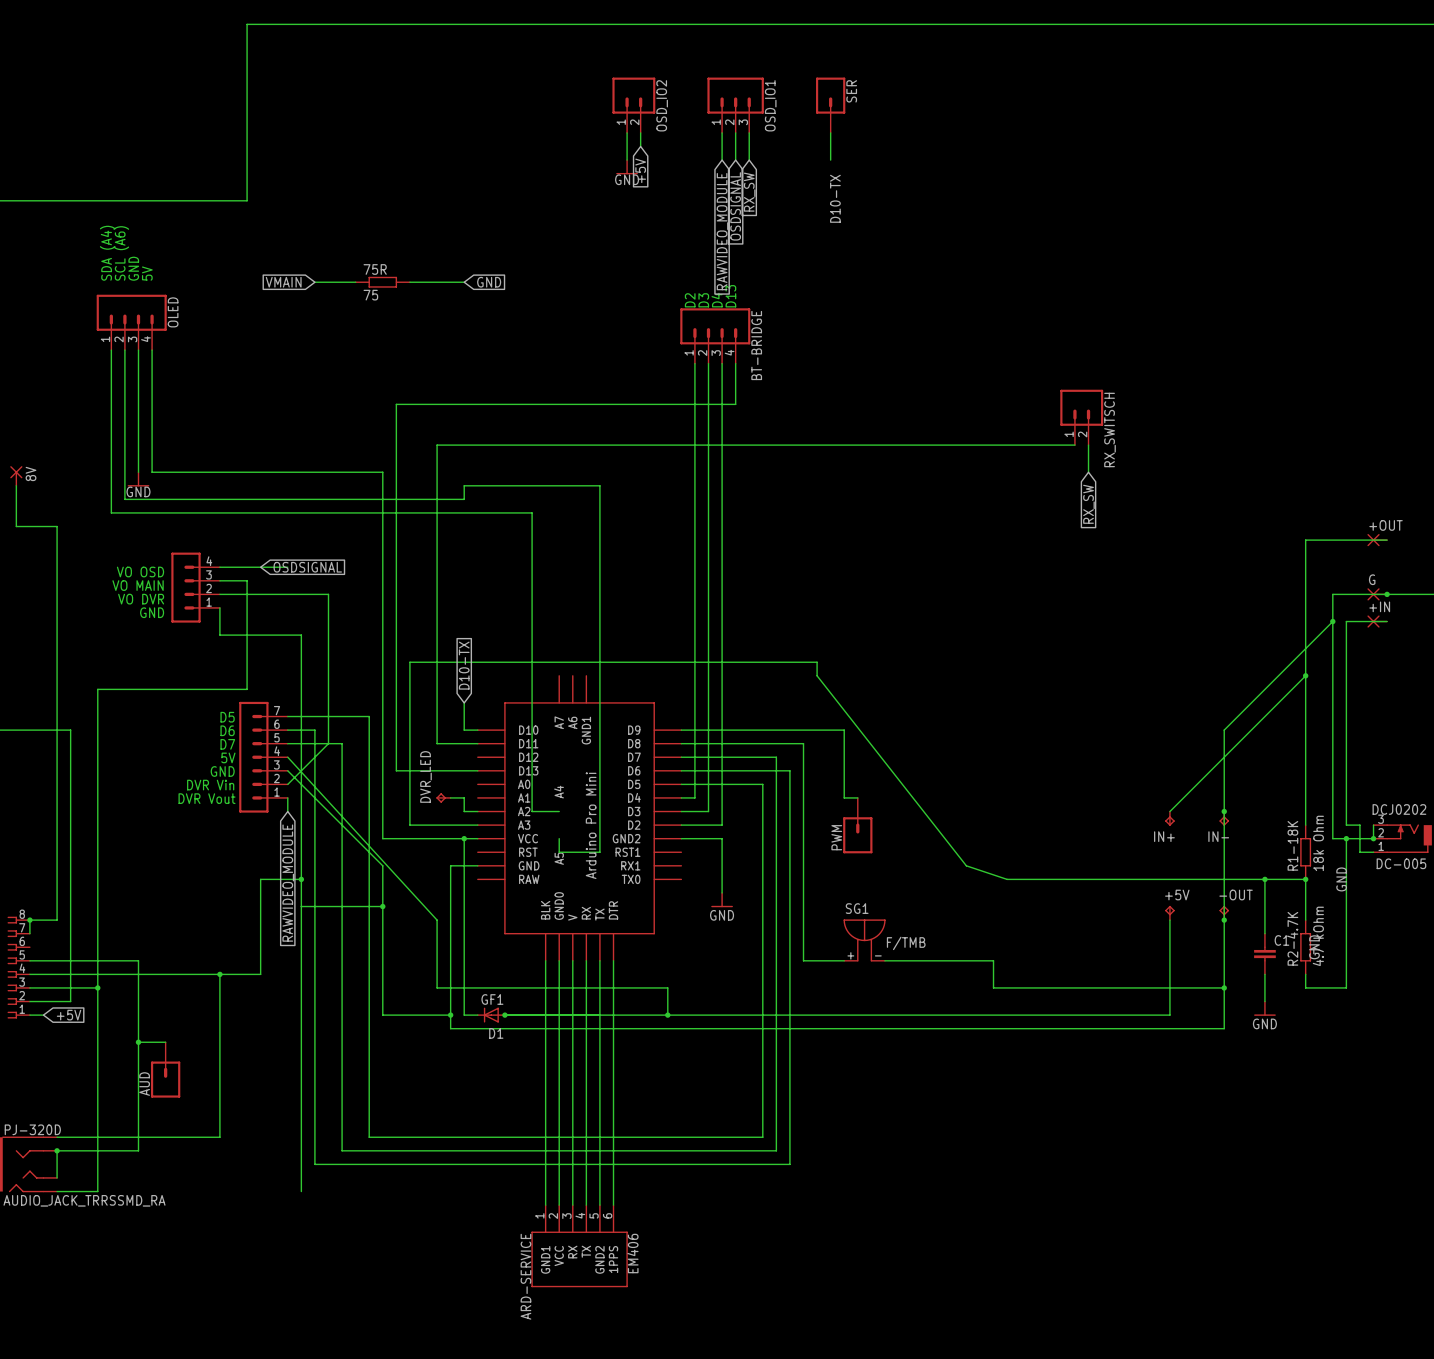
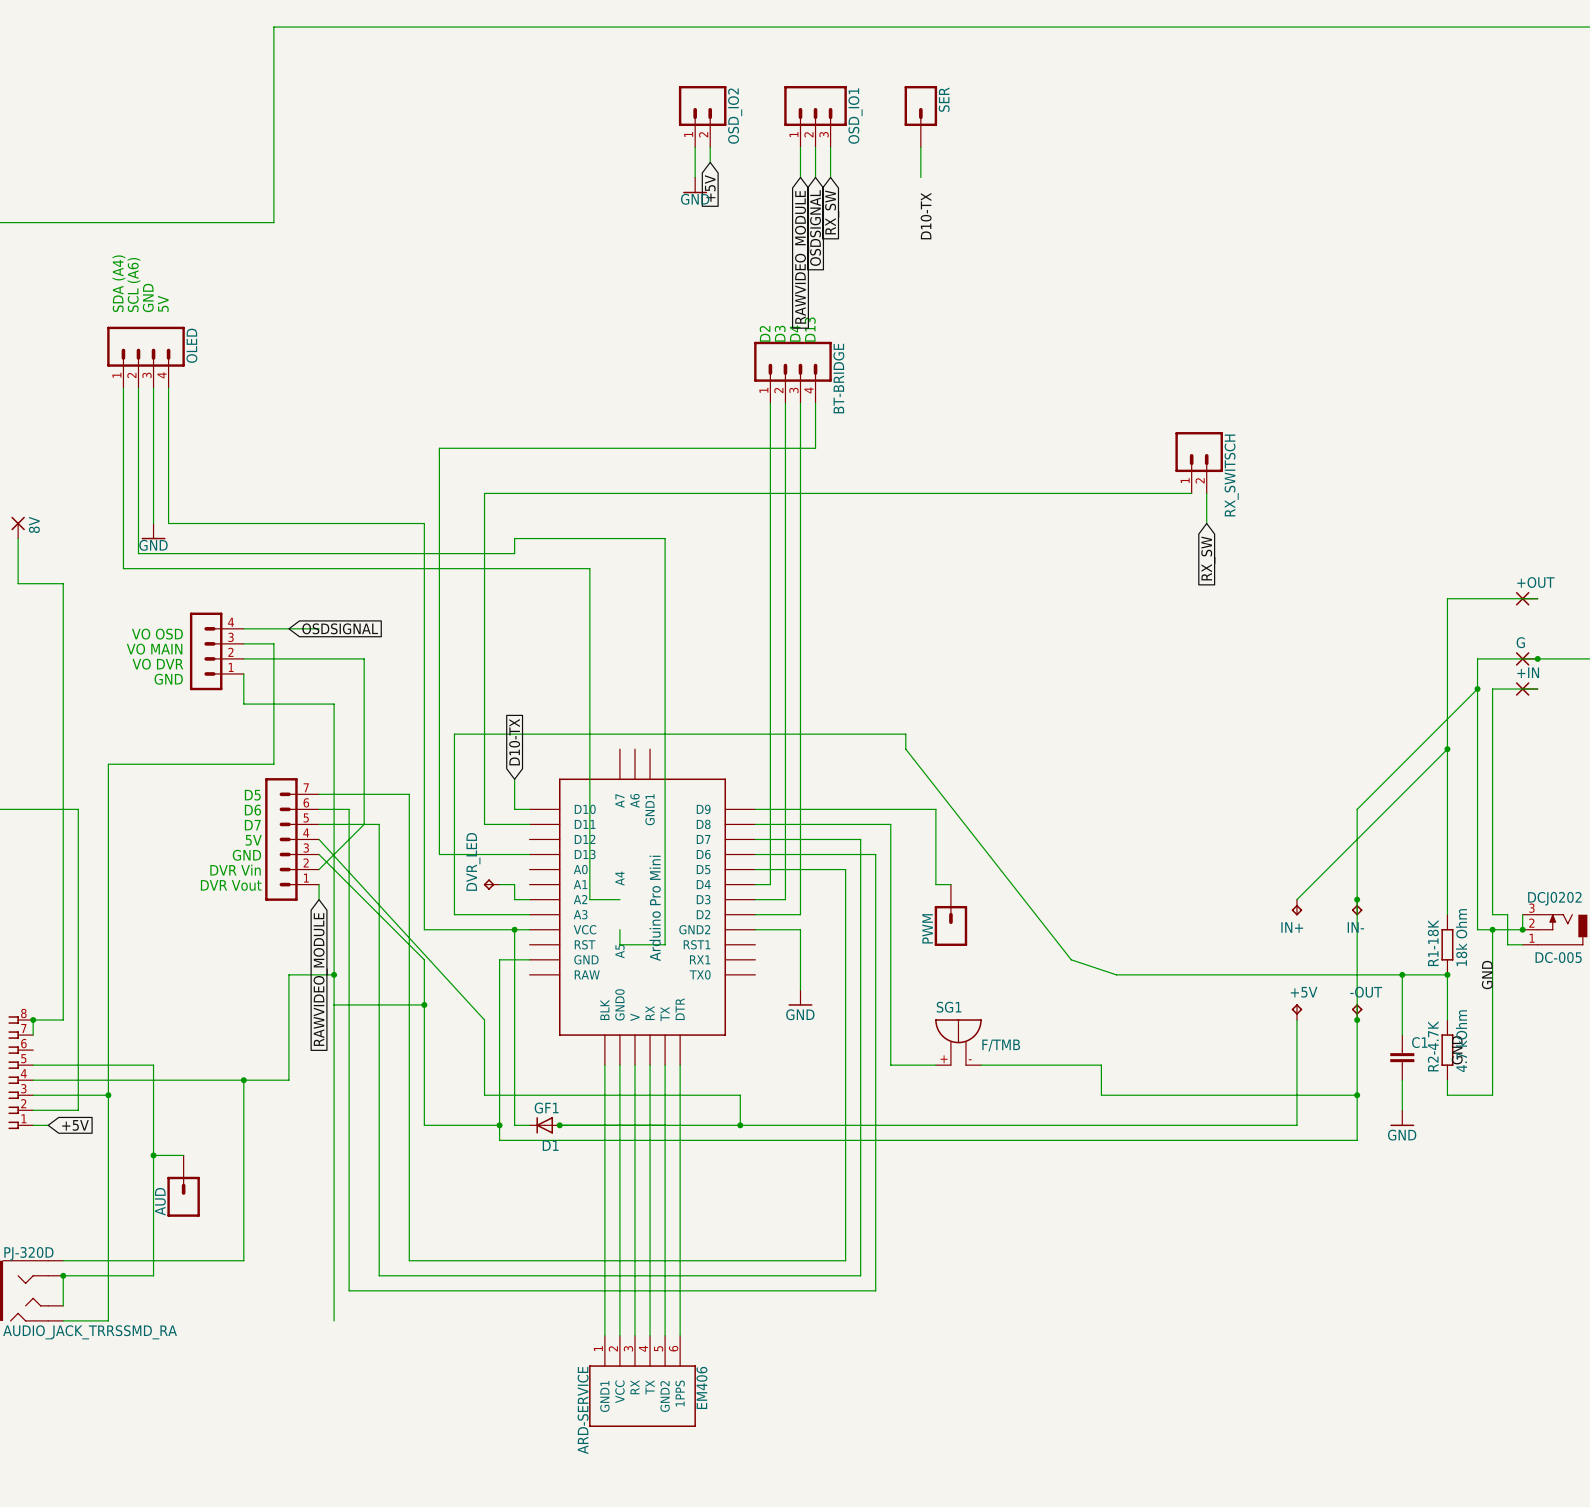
global label: VMAIN (283, 282) -> none
wire: (314, 282) (355, 282) -> none
75R: 75 (382, 282) -> none
wire: (409, 282) (464, 282) -> none
global label: GND (489, 282) -> none

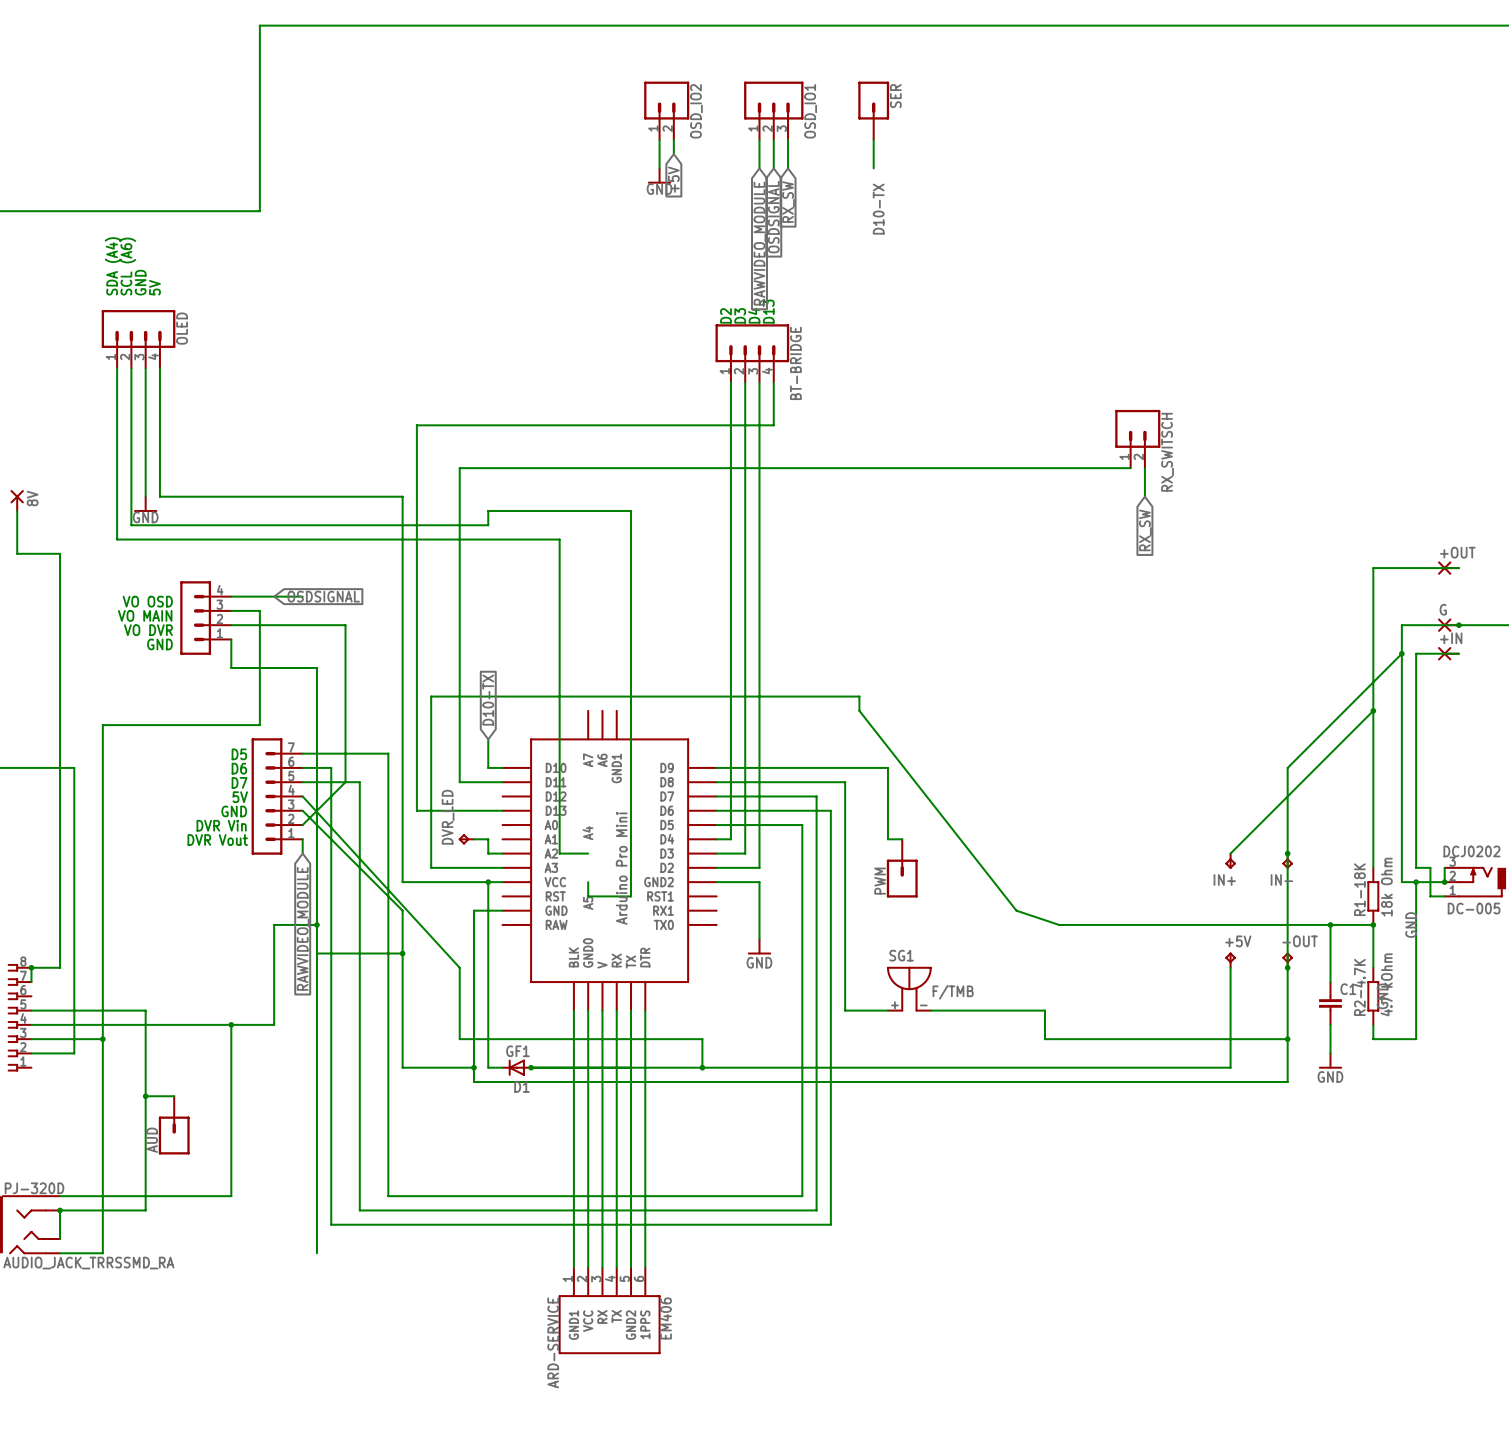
wire: (33, 1125) (48, 1125) -> none
global label: +5V (75, 1125) -> none

